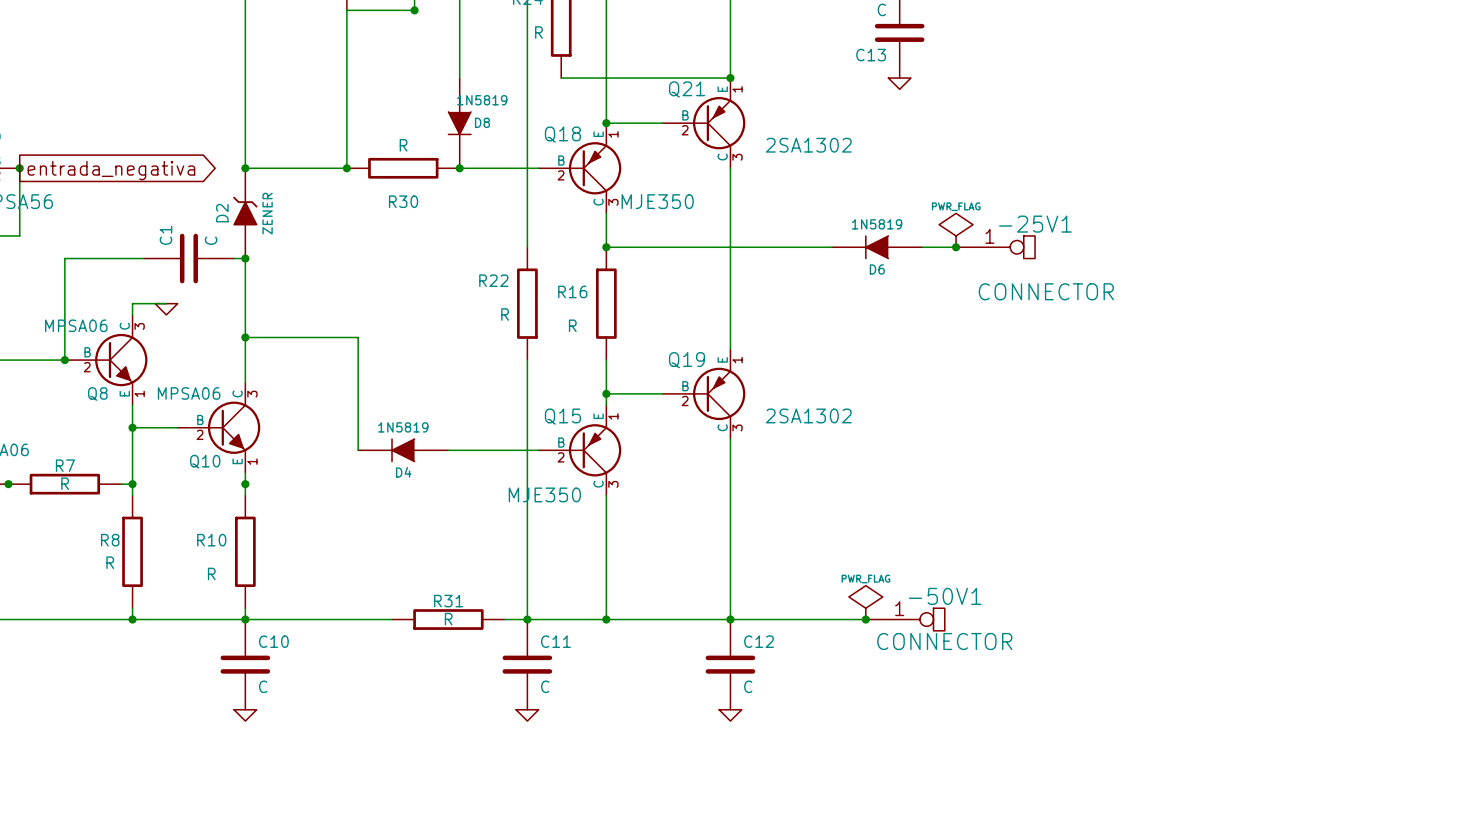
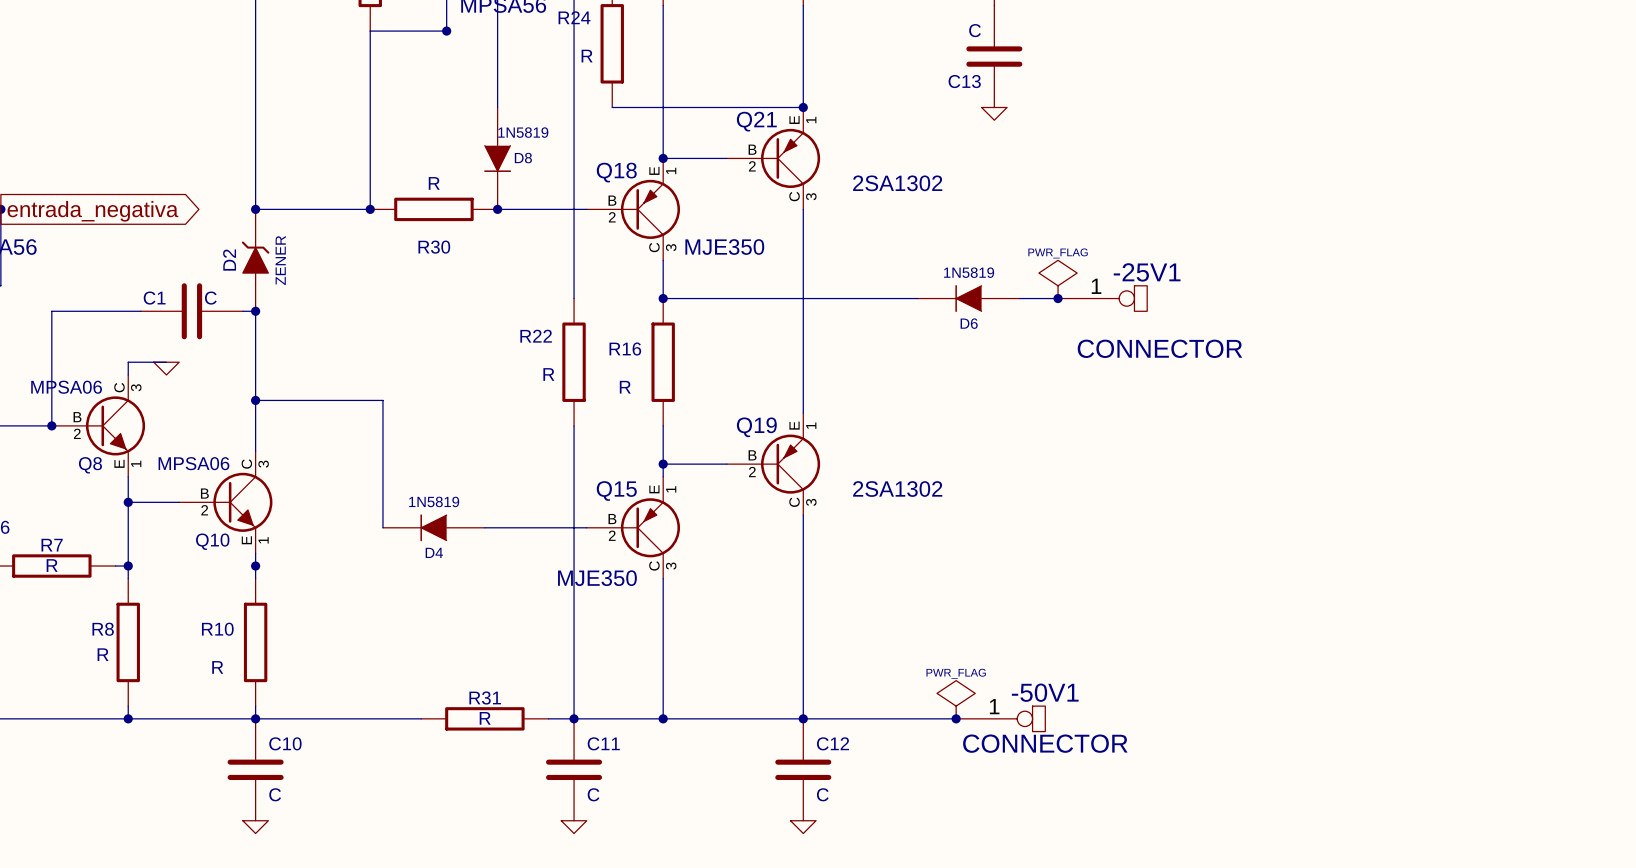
C1 name rotation: 0° (165, 235) -> 90° clockwise (154, 298)
C1 value rotation: 0° (211, 240) -> 90° clockwise (210, 298)

